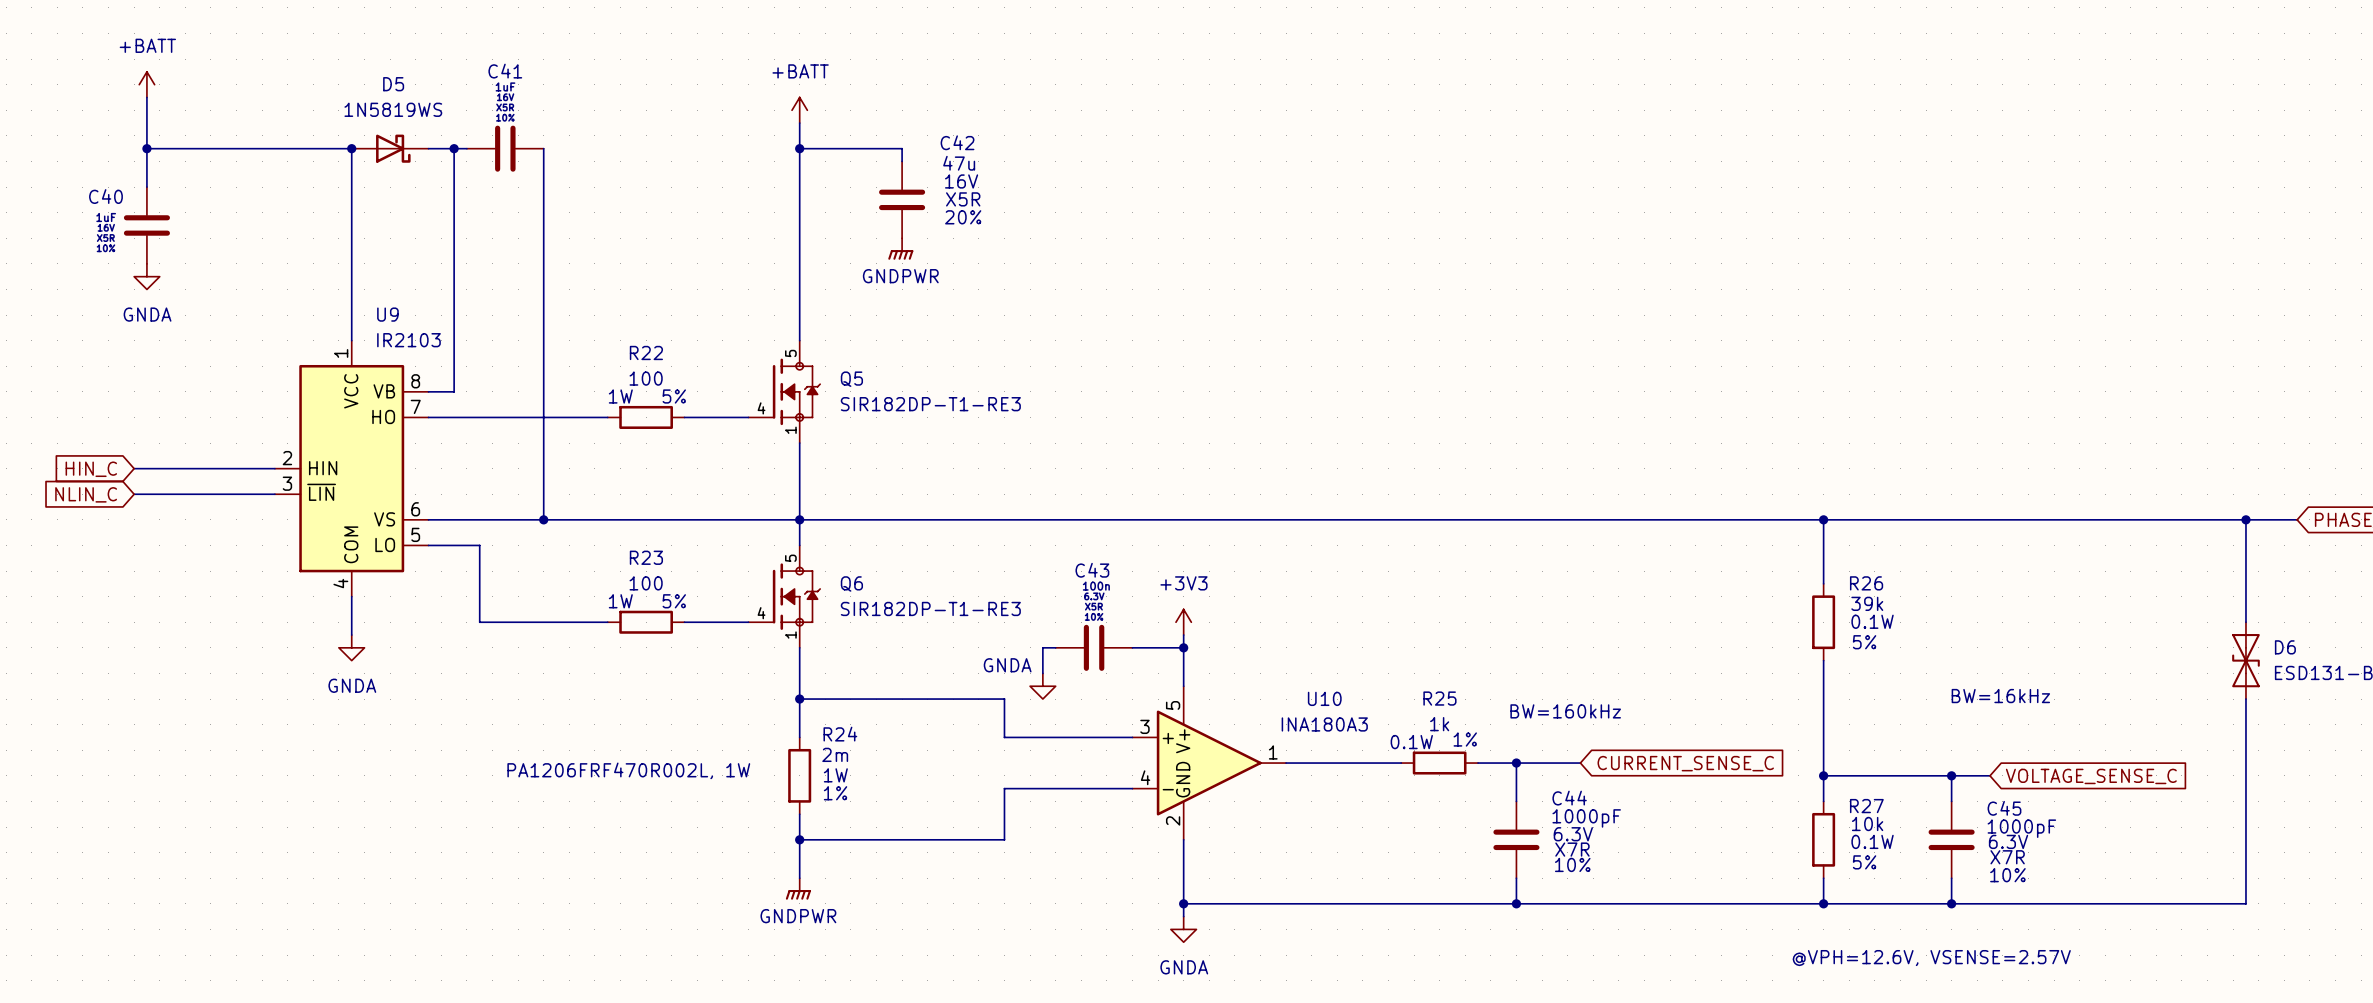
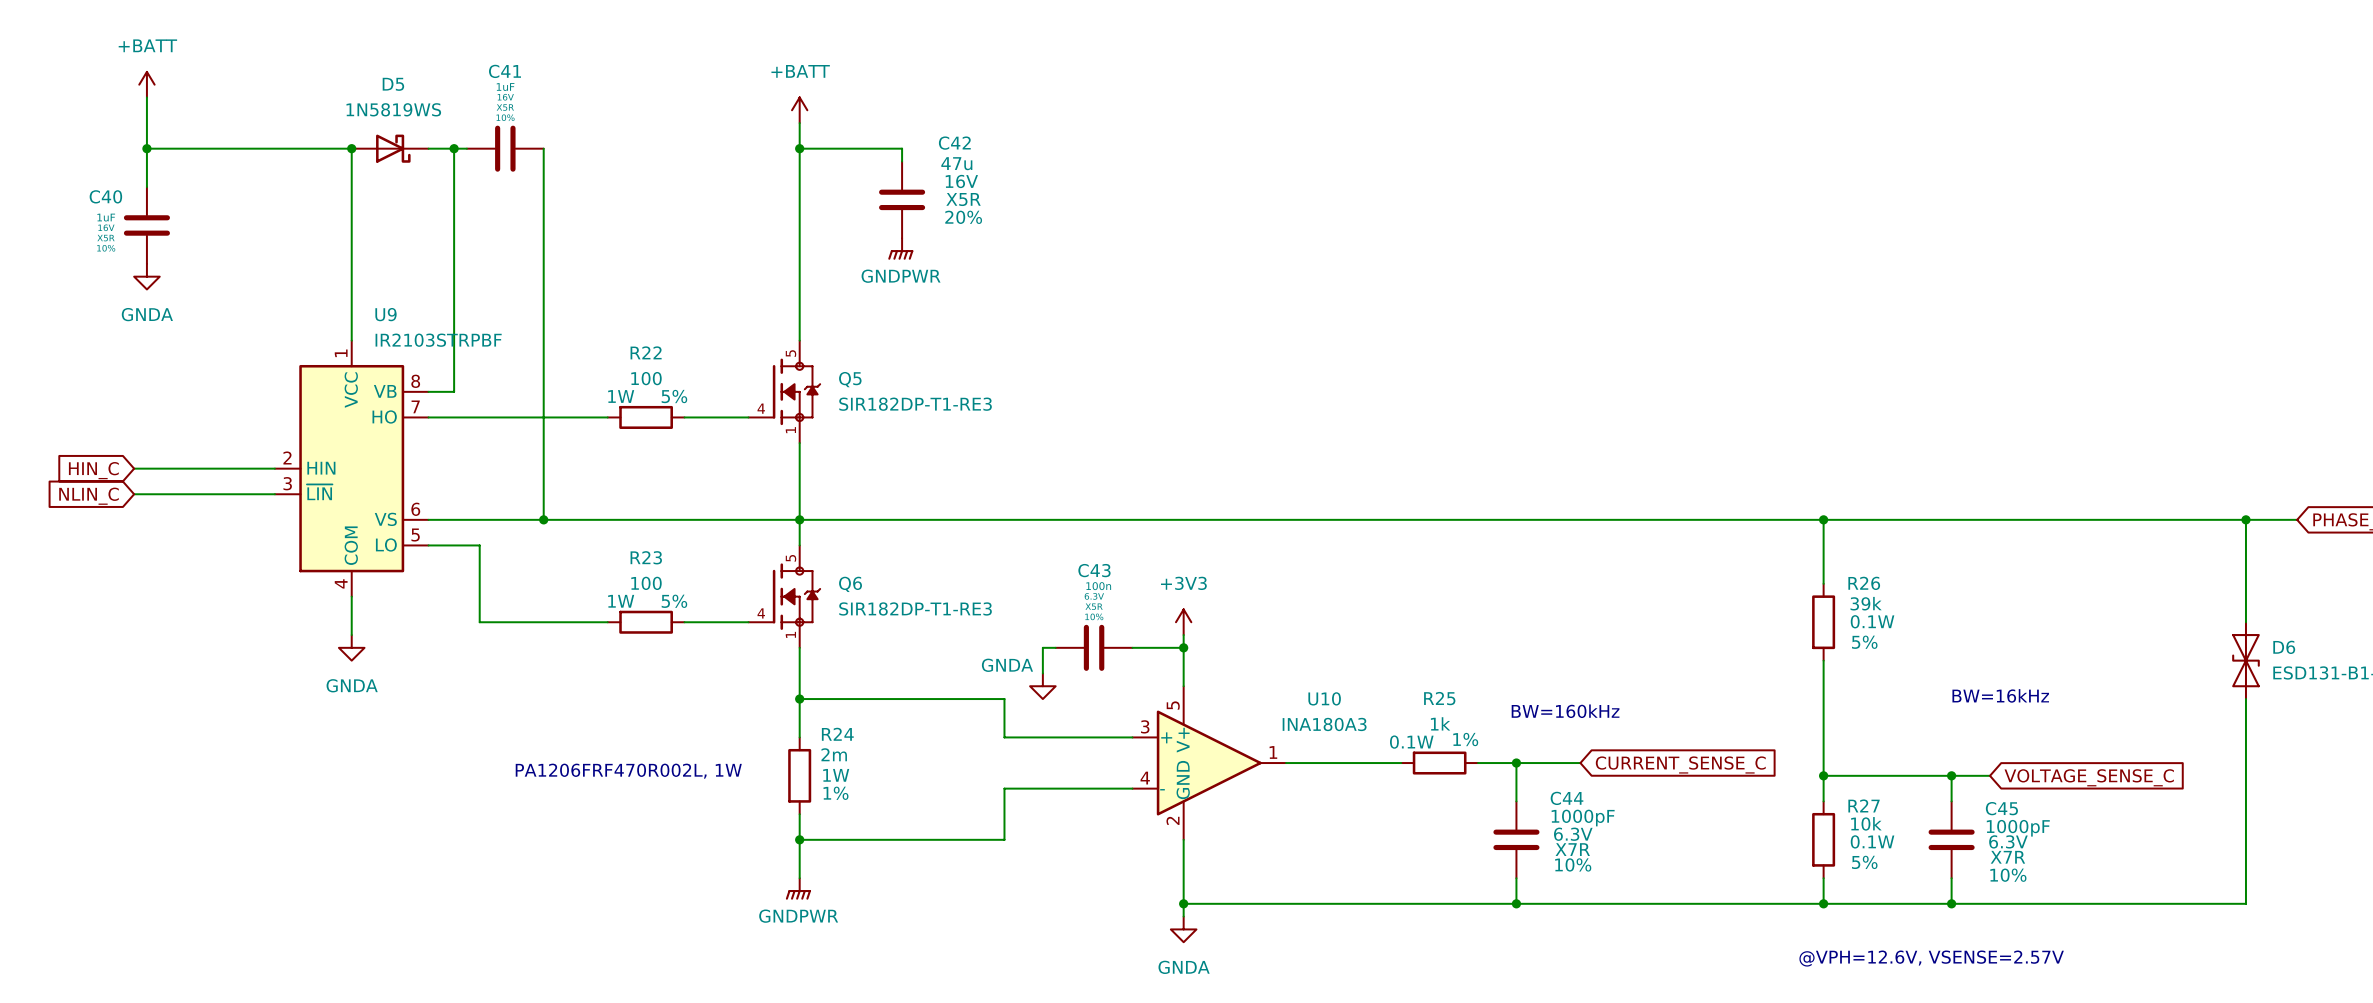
U9 value: IR2103 (408, 340) -> IR2103STRPBF (438, 340)

